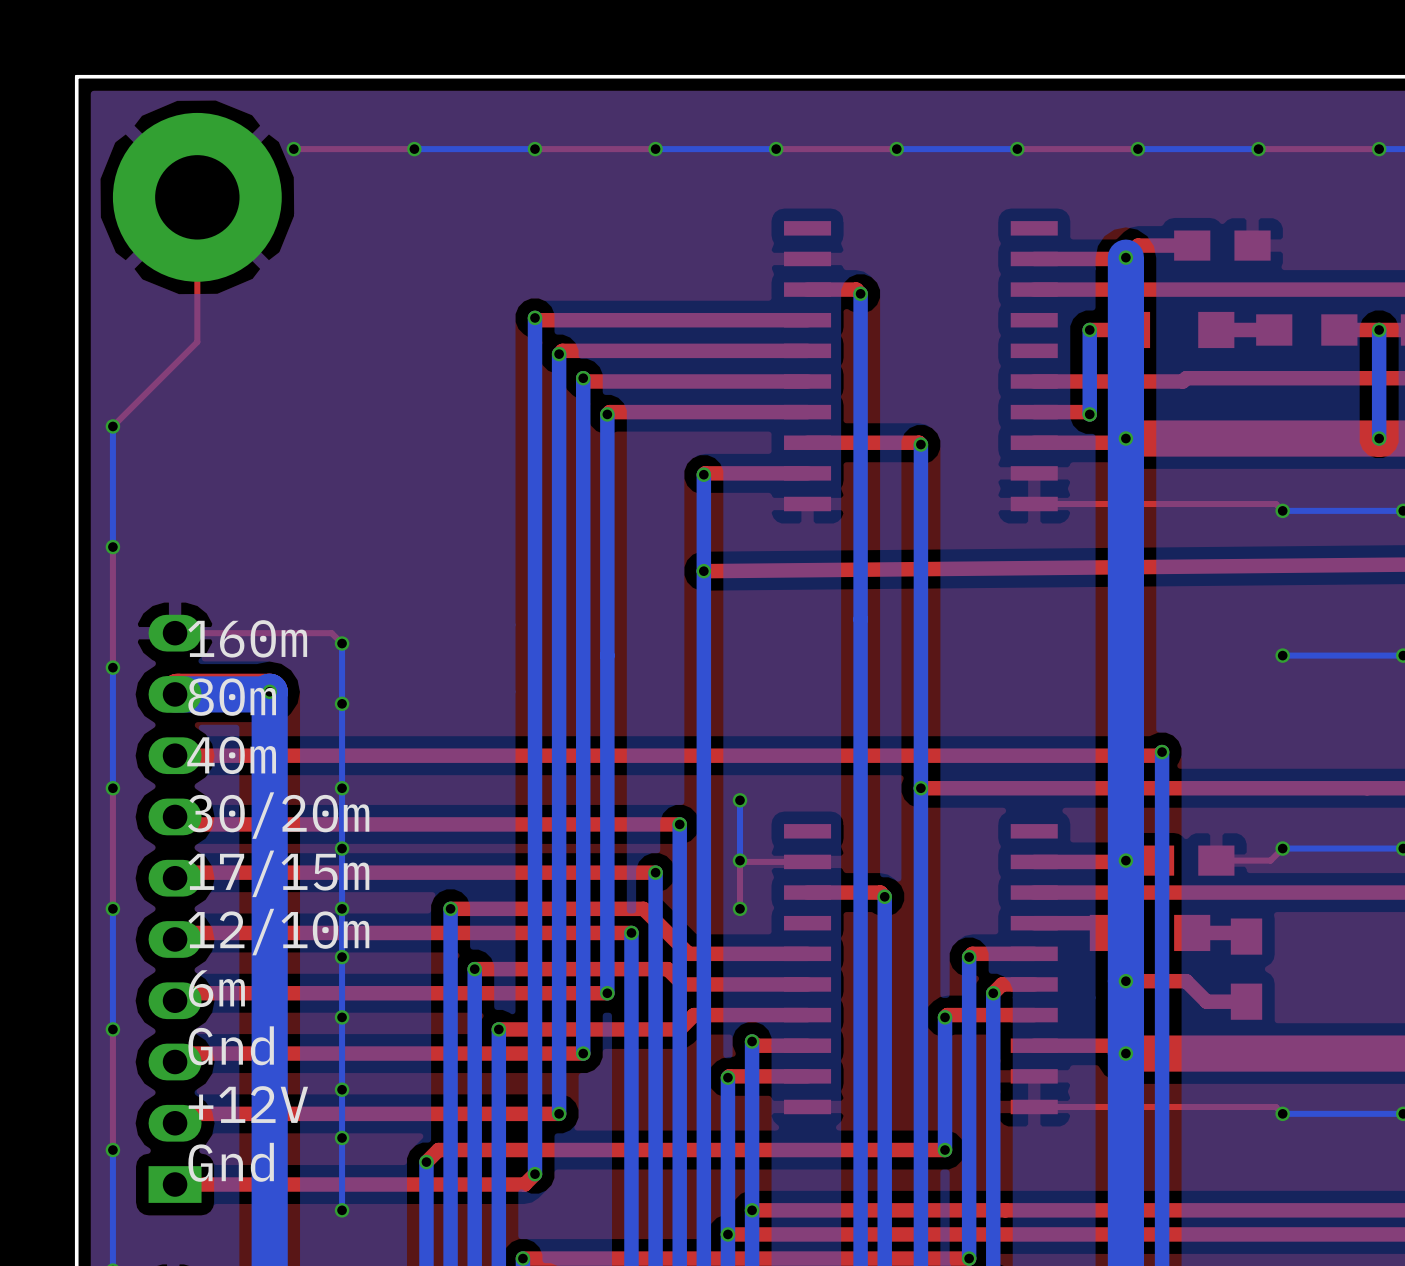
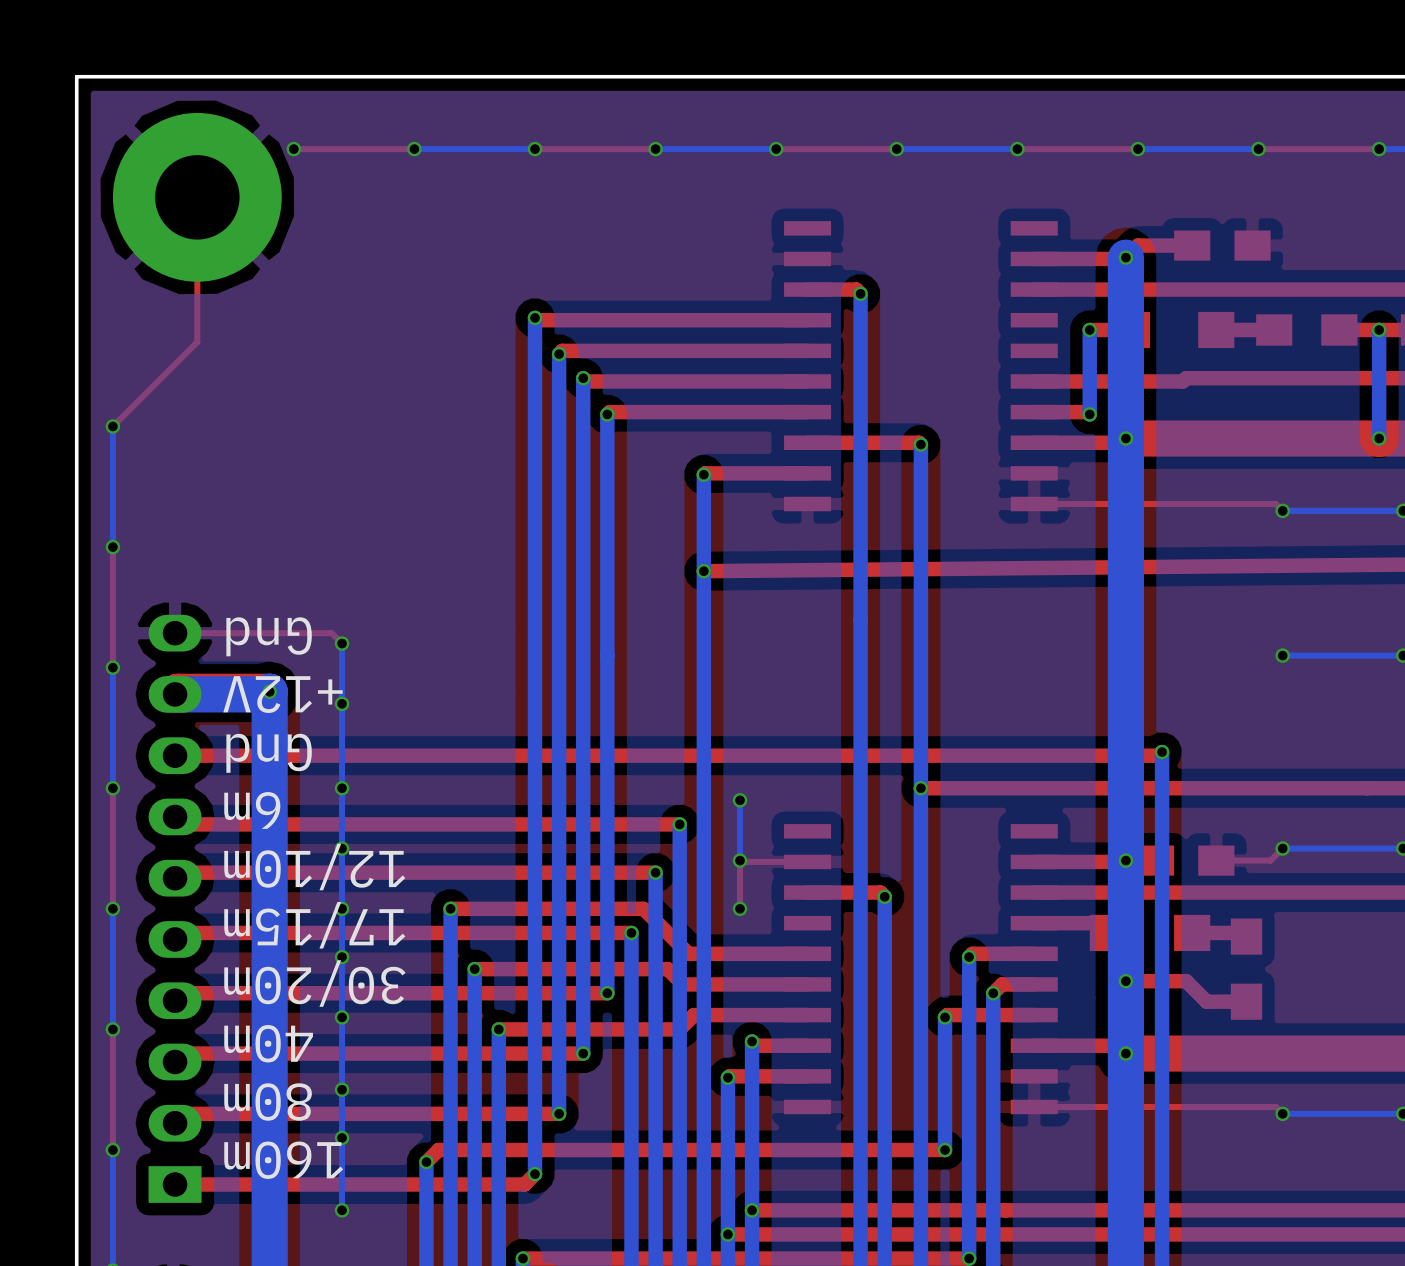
text: none -> Gnd (269, 636)
text rotation: 0° (247, 638) -> 180° (283, 1160)
text position: 160m (247, 638) -> 160m (283, 1160)
text rotation: 0° (232, 697) -> 180° (268, 1102)
text position: 80m (232, 697) -> 80m (268, 1102)
text: none -> Gnd (269, 753)
text rotation: 0° (231, 755) -> 180° (268, 1043)
text position: 40m (231, 755) -> 40m (268, 1043)
text rotation: 0° (278, 815) -> 180° (314, 983)
text rotation: 0° (278, 873) -> 180° (314, 925)
text rotation: 0° (278, 932) -> 180° (314, 867)
text rotation: 0° (216, 988) -> 180° (252, 810)
text position: 6m (216, 988) -> 6m (252, 810)
text: Gnd (231, 1045) -> none
text rotation: 0° (248, 1104) -> 180° (282, 694)
text position: +12V (248, 1104) -> +12V (282, 694)
text: Gnd (231, 1162) -> none

